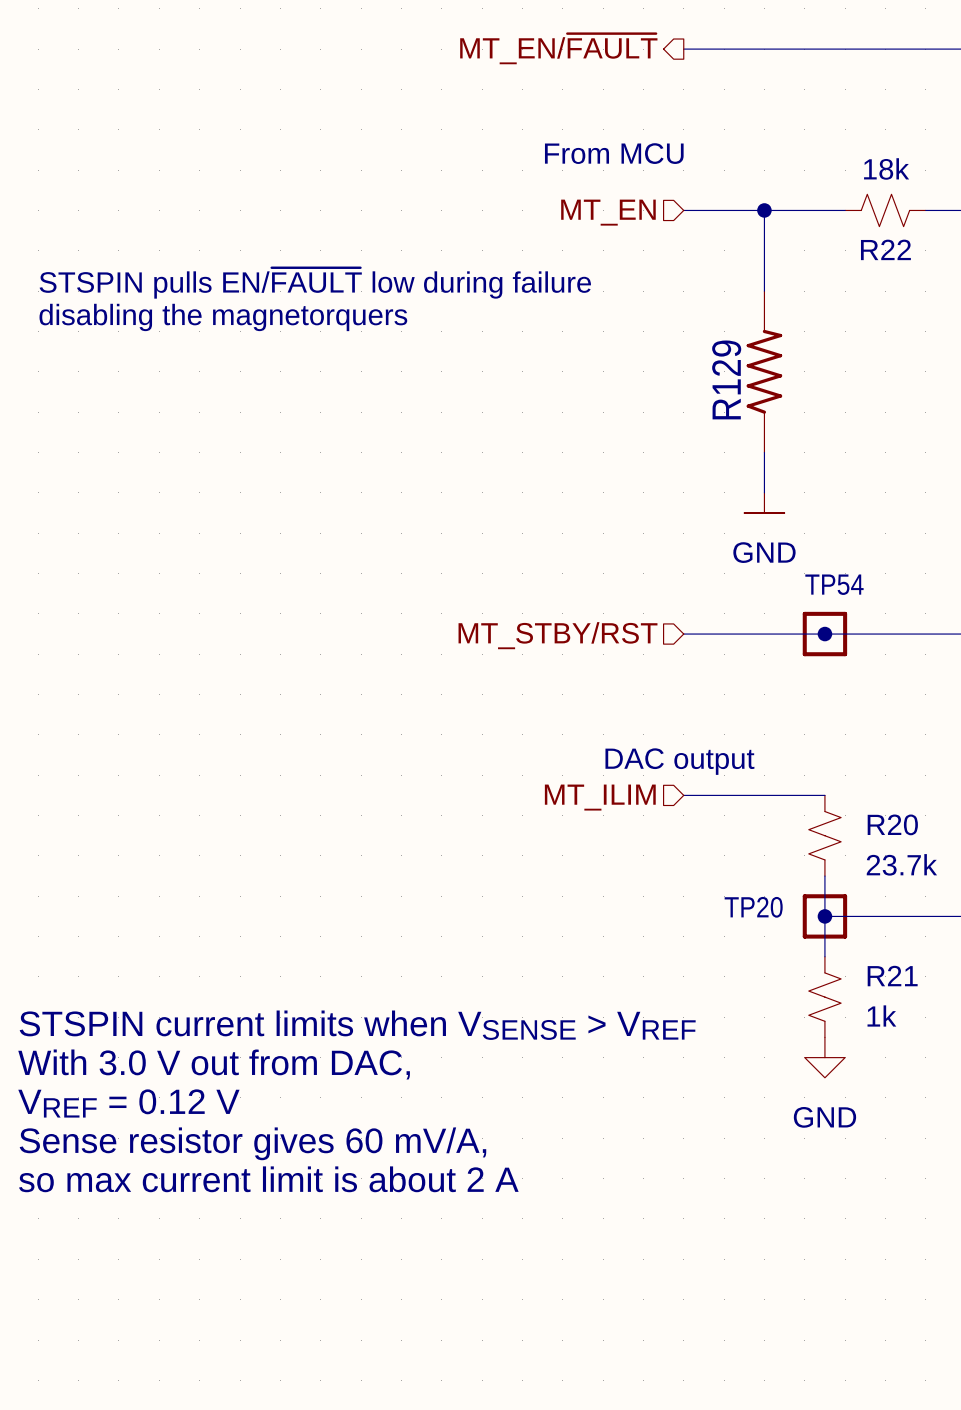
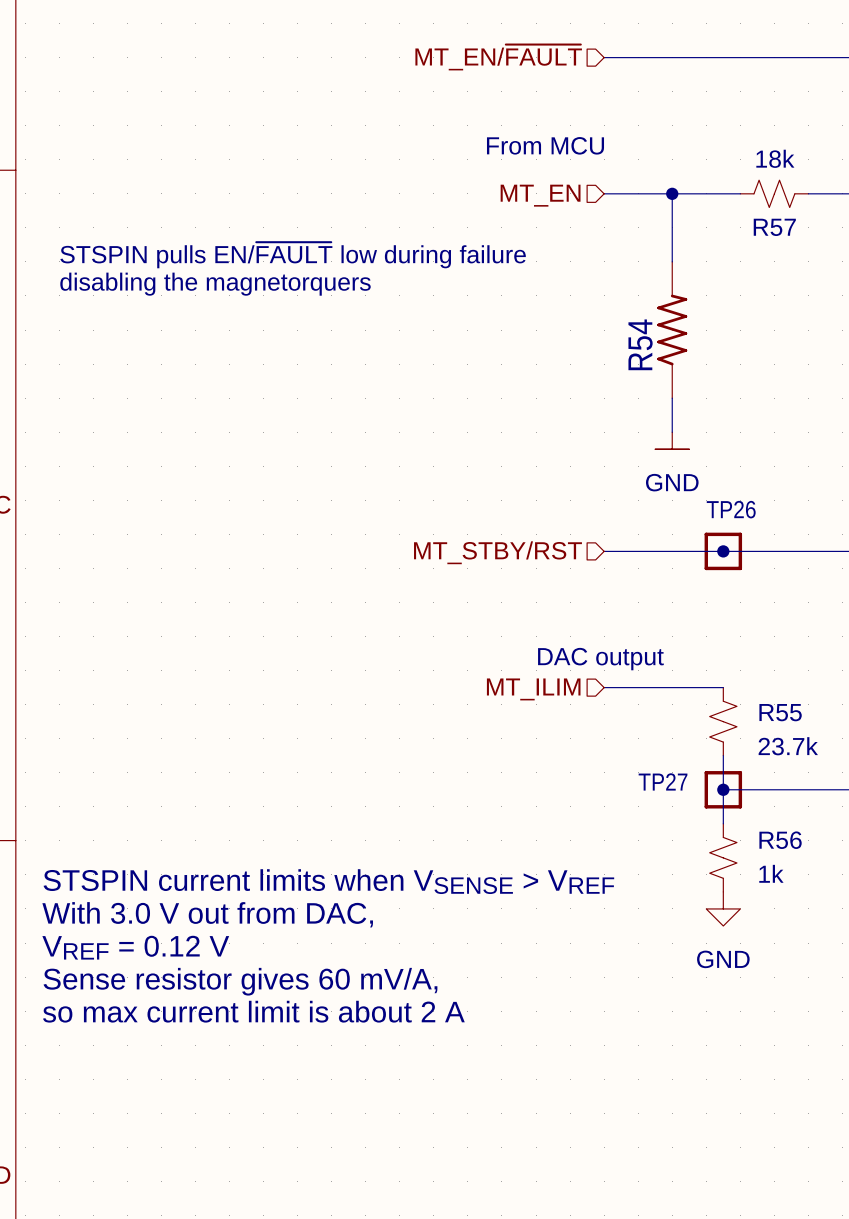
hierarchical label shape: output (558, 48) -> input (498, 57)
R22 name: R22 (885, 249) -> R57 (774, 227)
R129 name: R129 (726, 379) -> R54 (640, 344)
TP54 name: TP54 (834, 584) -> TP26 (731, 509)
R20 name: R20 (892, 824) -> R55 (780, 712)
TP20 name: TP20 (753, 907) -> TP27 (663, 781)
R21 name: R21 (892, 976) -> R56 (780, 840)

